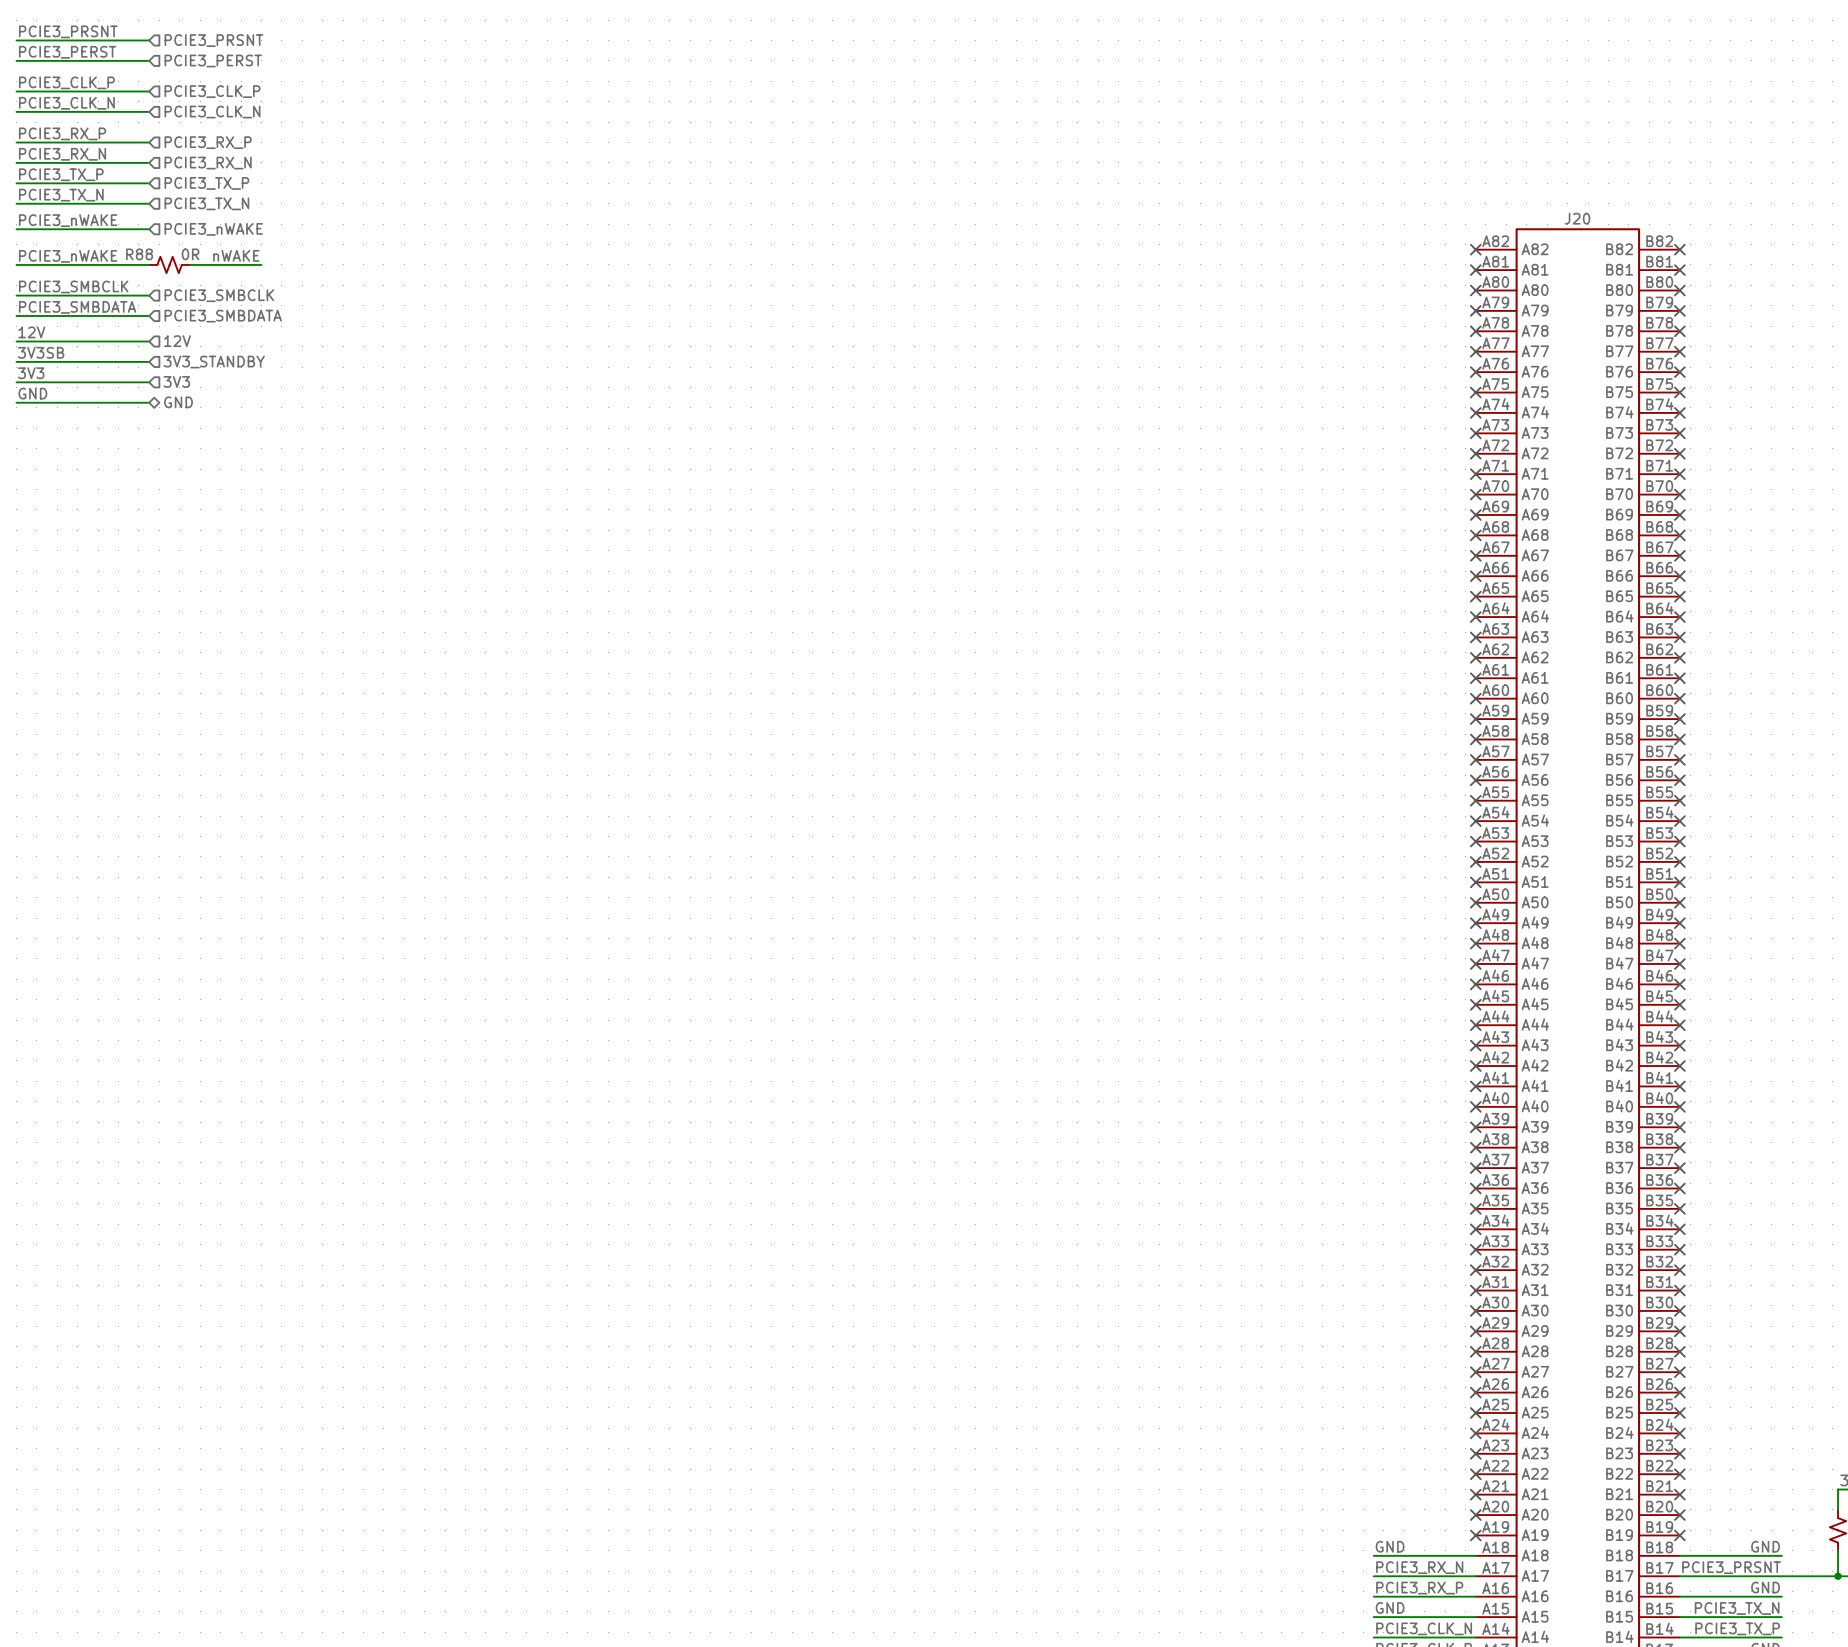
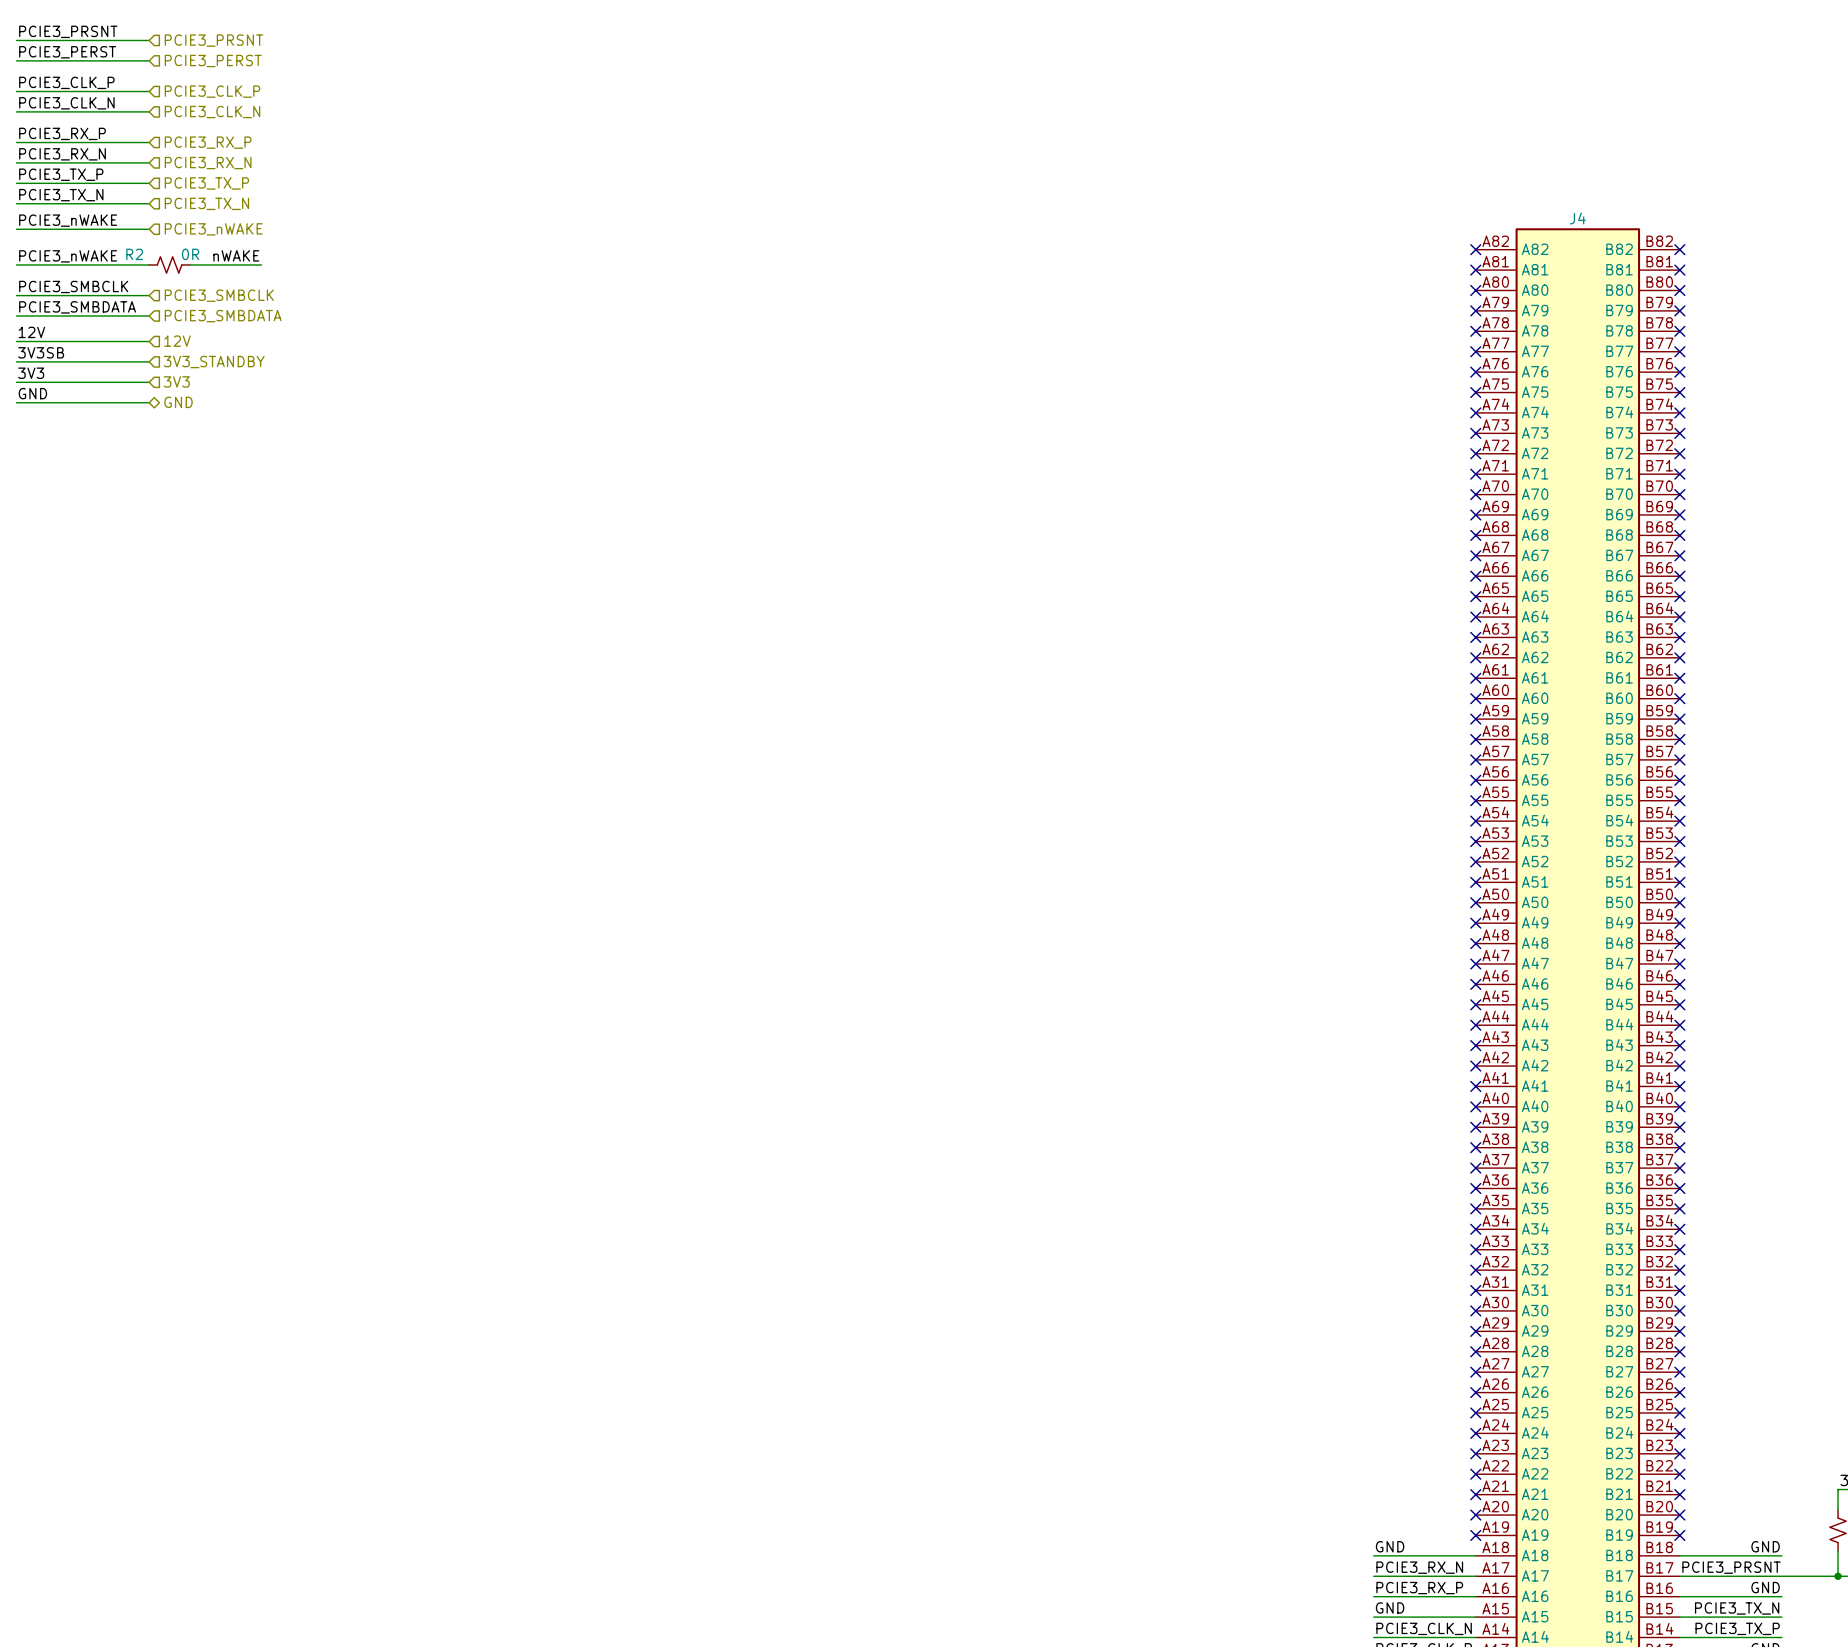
J20 name: J20 (1577, 218) -> J4 (1577, 218)
R88 name: R88 (139, 254) -> R2 (134, 254)

